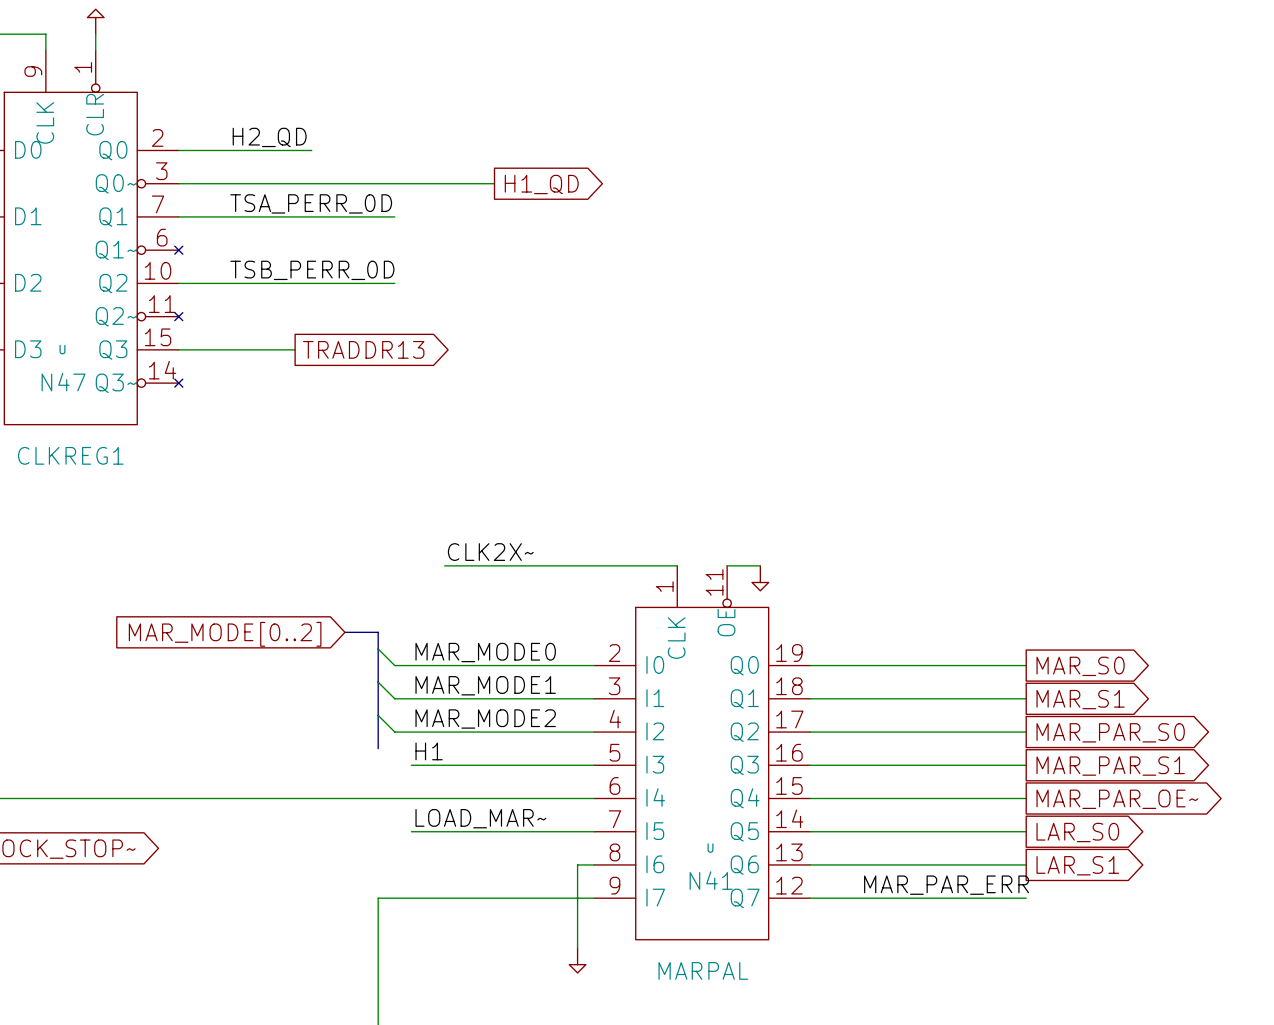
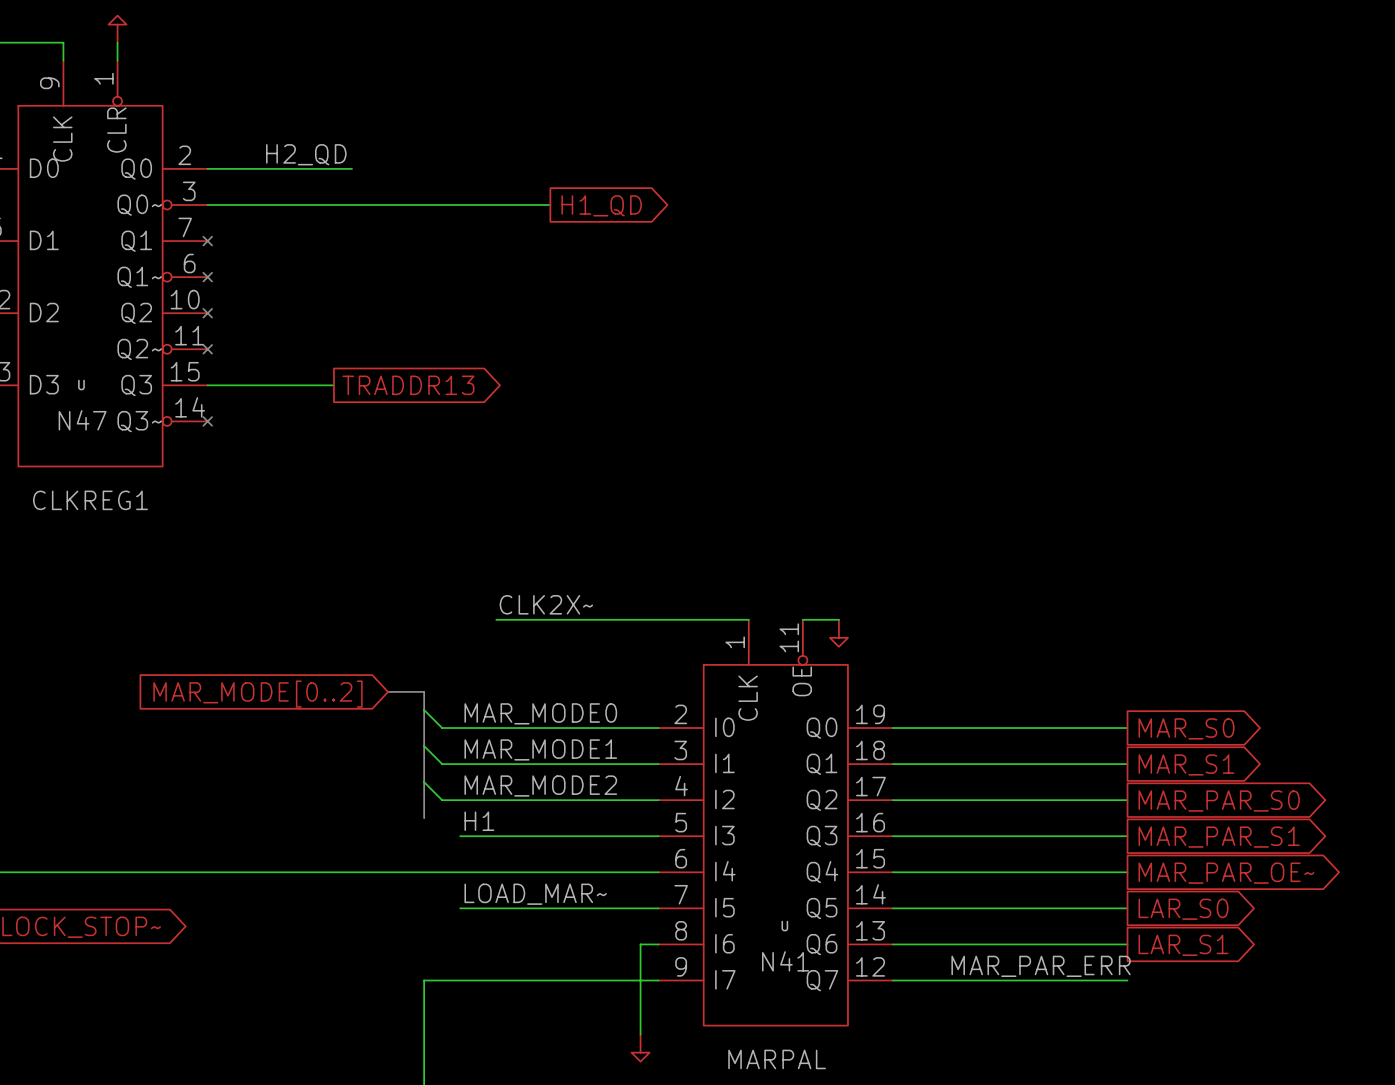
label: TSA_PERR_0D (311, 203) -> none
wire: (178, 216) (394, 216) -> none
no-connect mark: none -> (207, 241)
label: TSB_PERR_0D (312, 270) -> none
wire: (178, 283) (394, 283) -> none
no-connect mark: none -> (207, 313)

